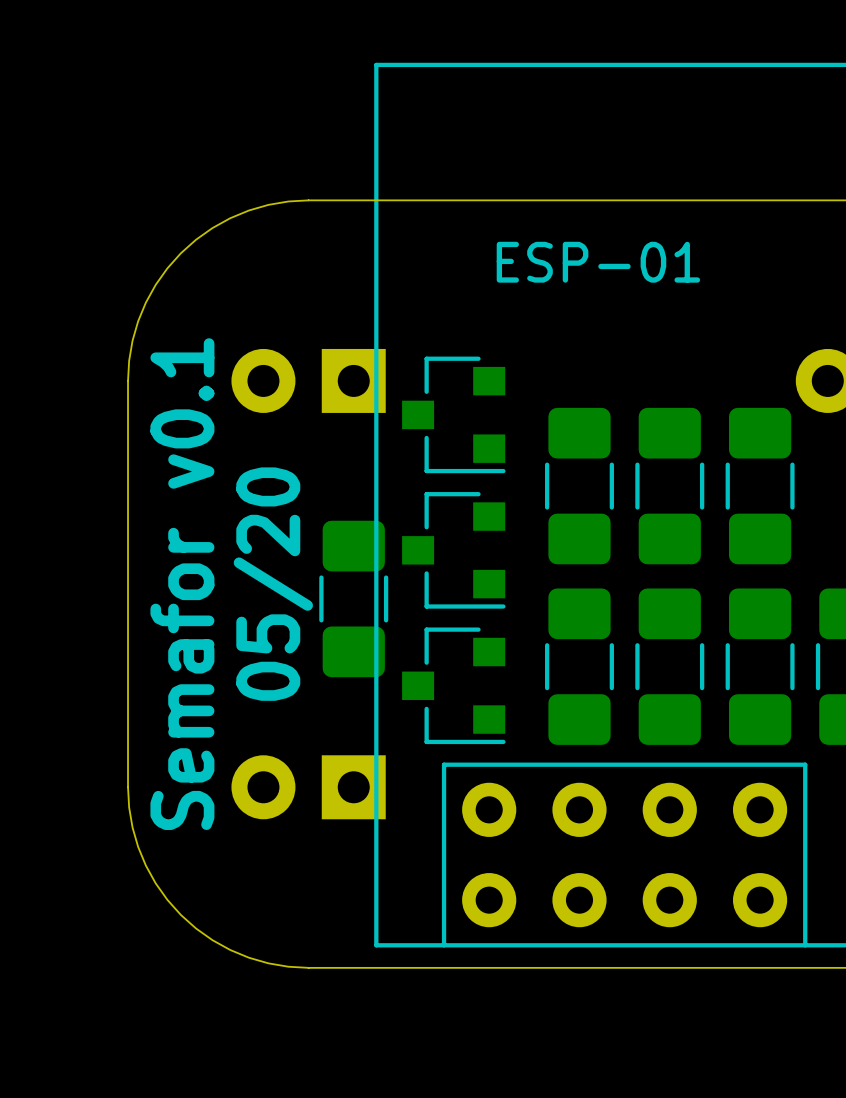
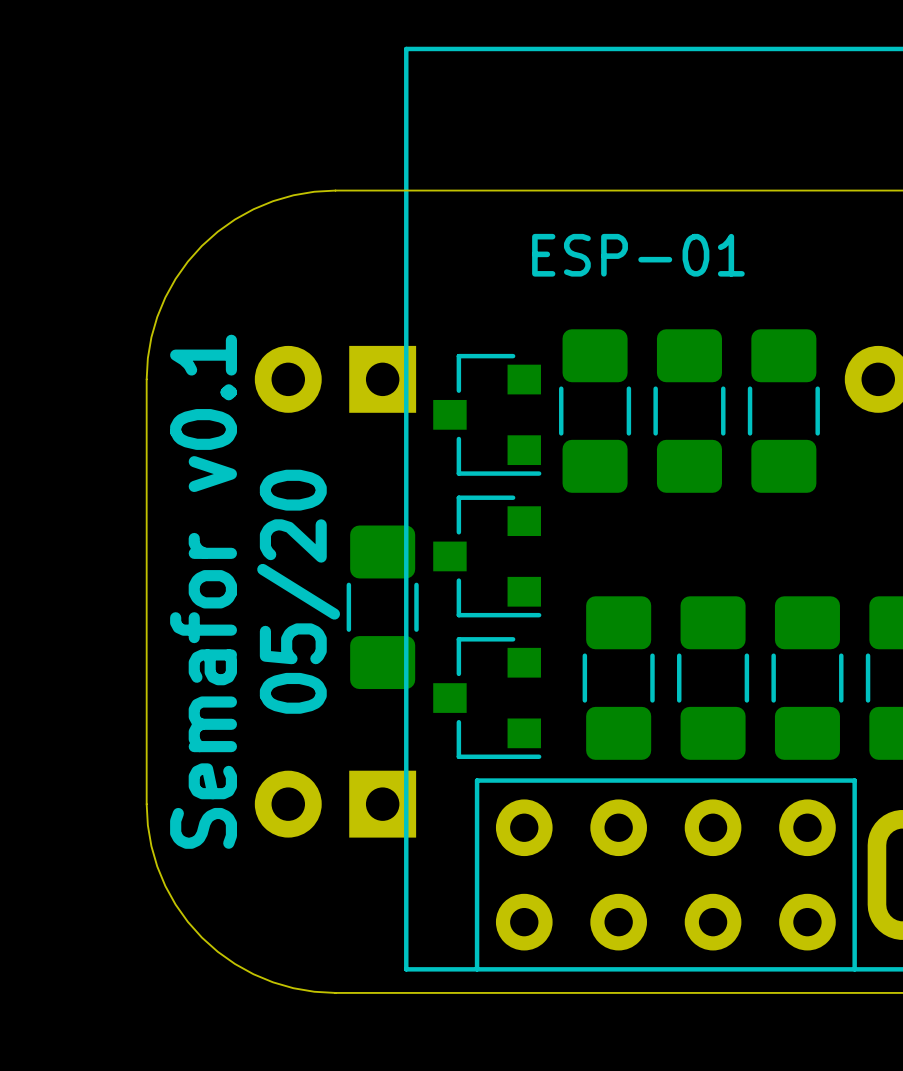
part: none -> (595, 411)
part: none -> (689, 411)
part: none -> (783, 411)
part: (579, 486) -> none
part: (669, 486) -> none
part: (760, 486) -> none

